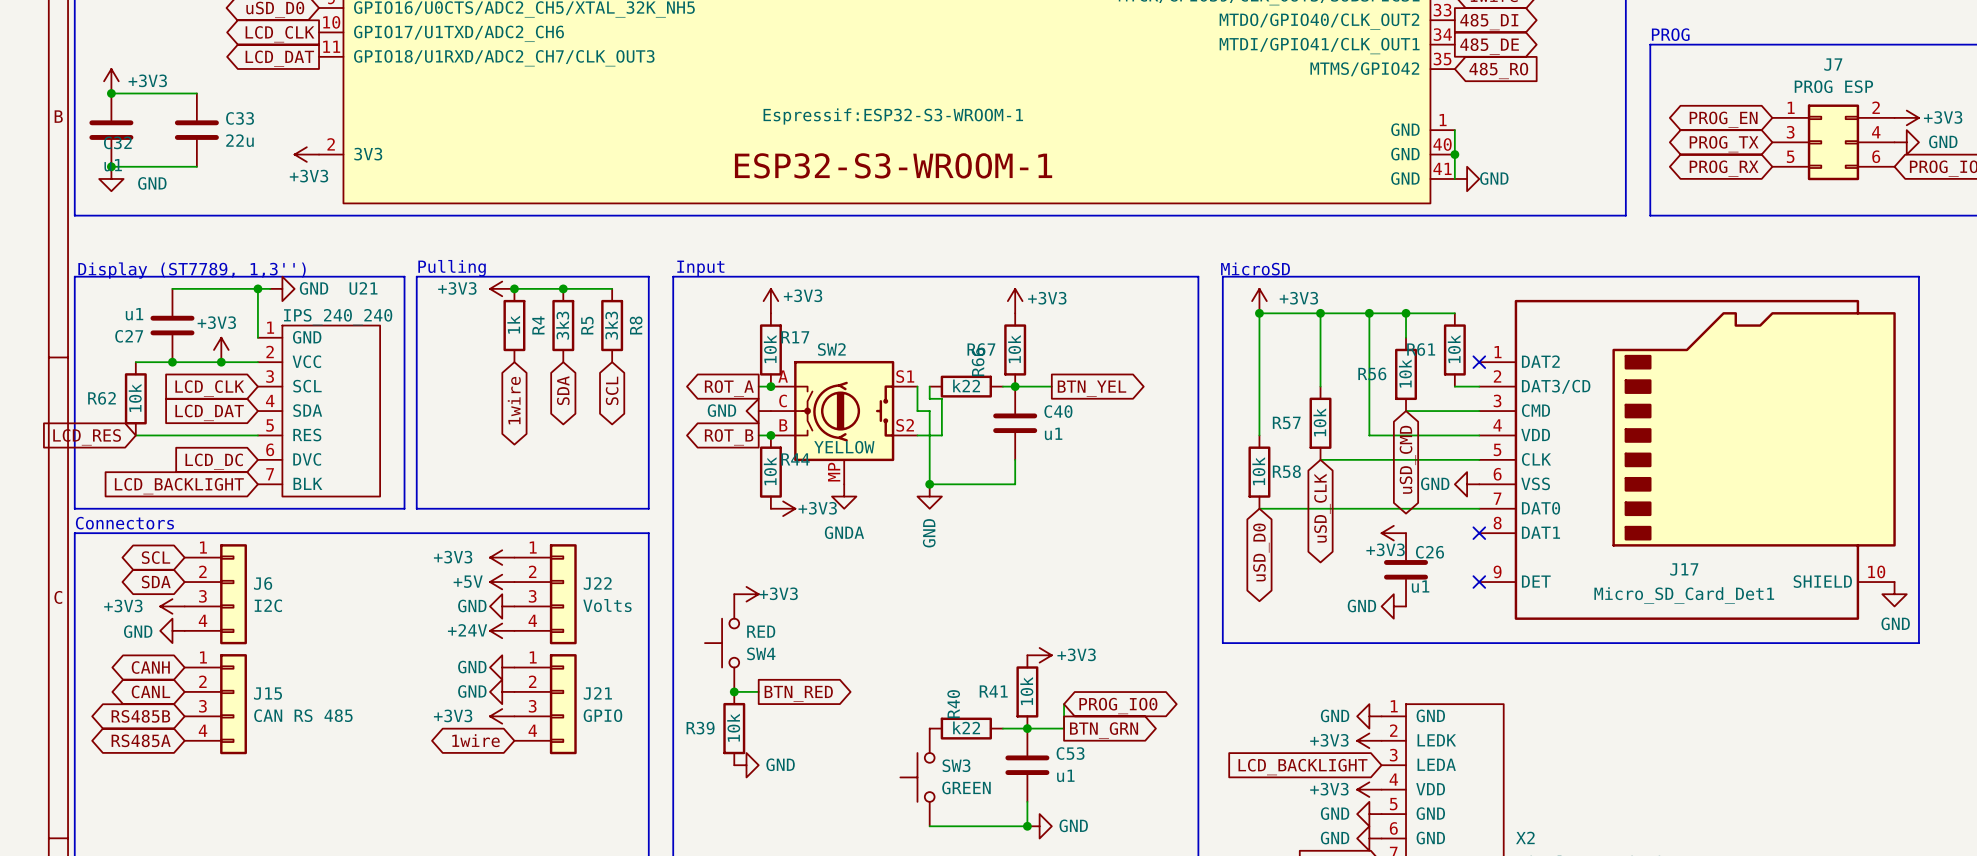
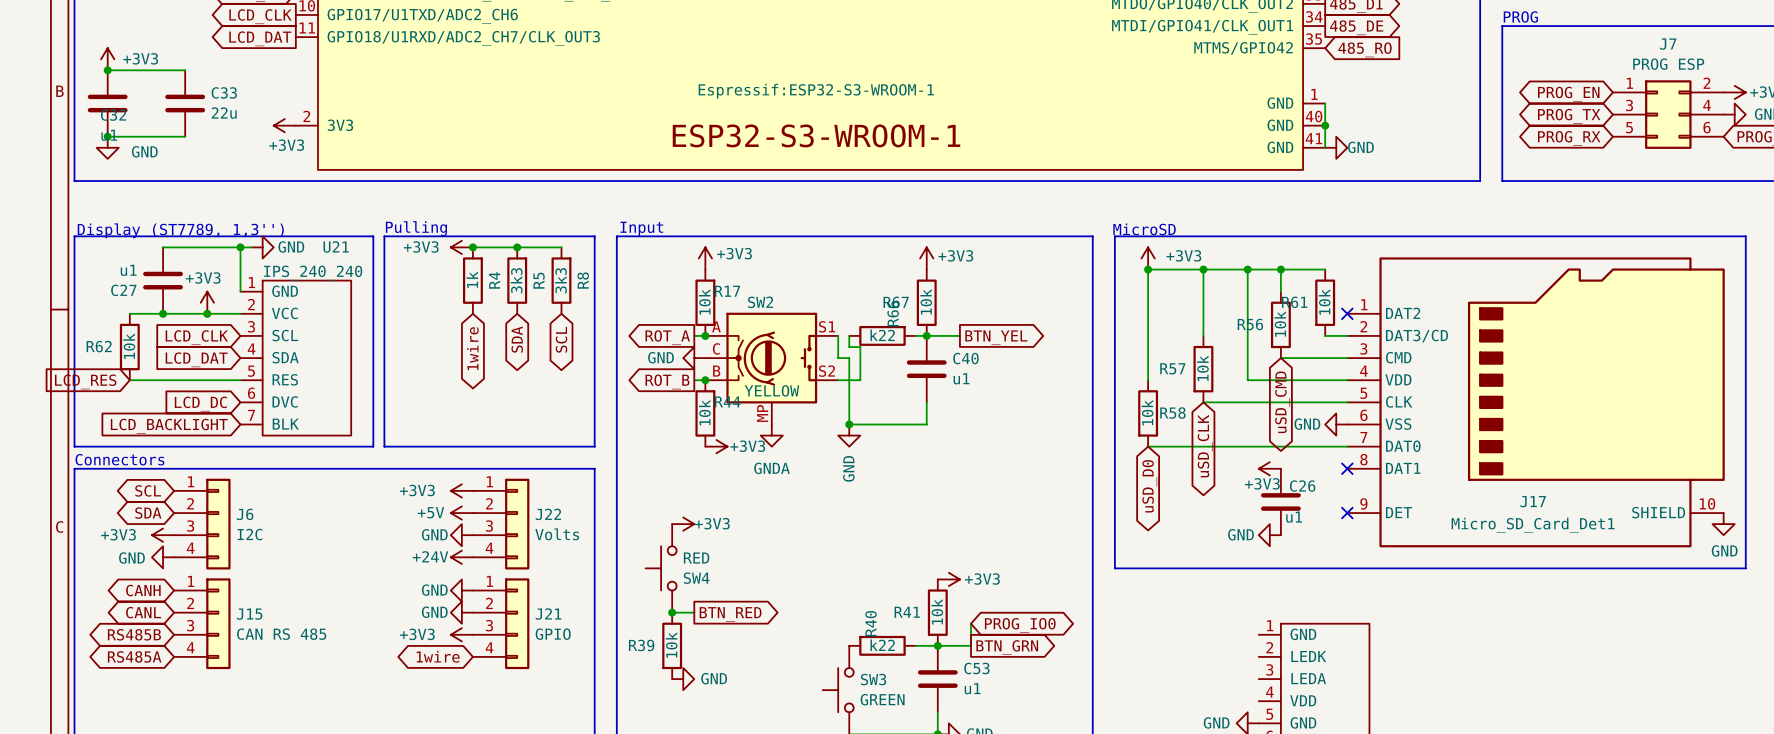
power symbol: GND (1369, 716) -> none
power symbol: +3V3 (1369, 740) -> none
global label: LCD_BACKLIGHT (1302, 767) -> none
power symbol: +3V3 (1369, 789) -> none

